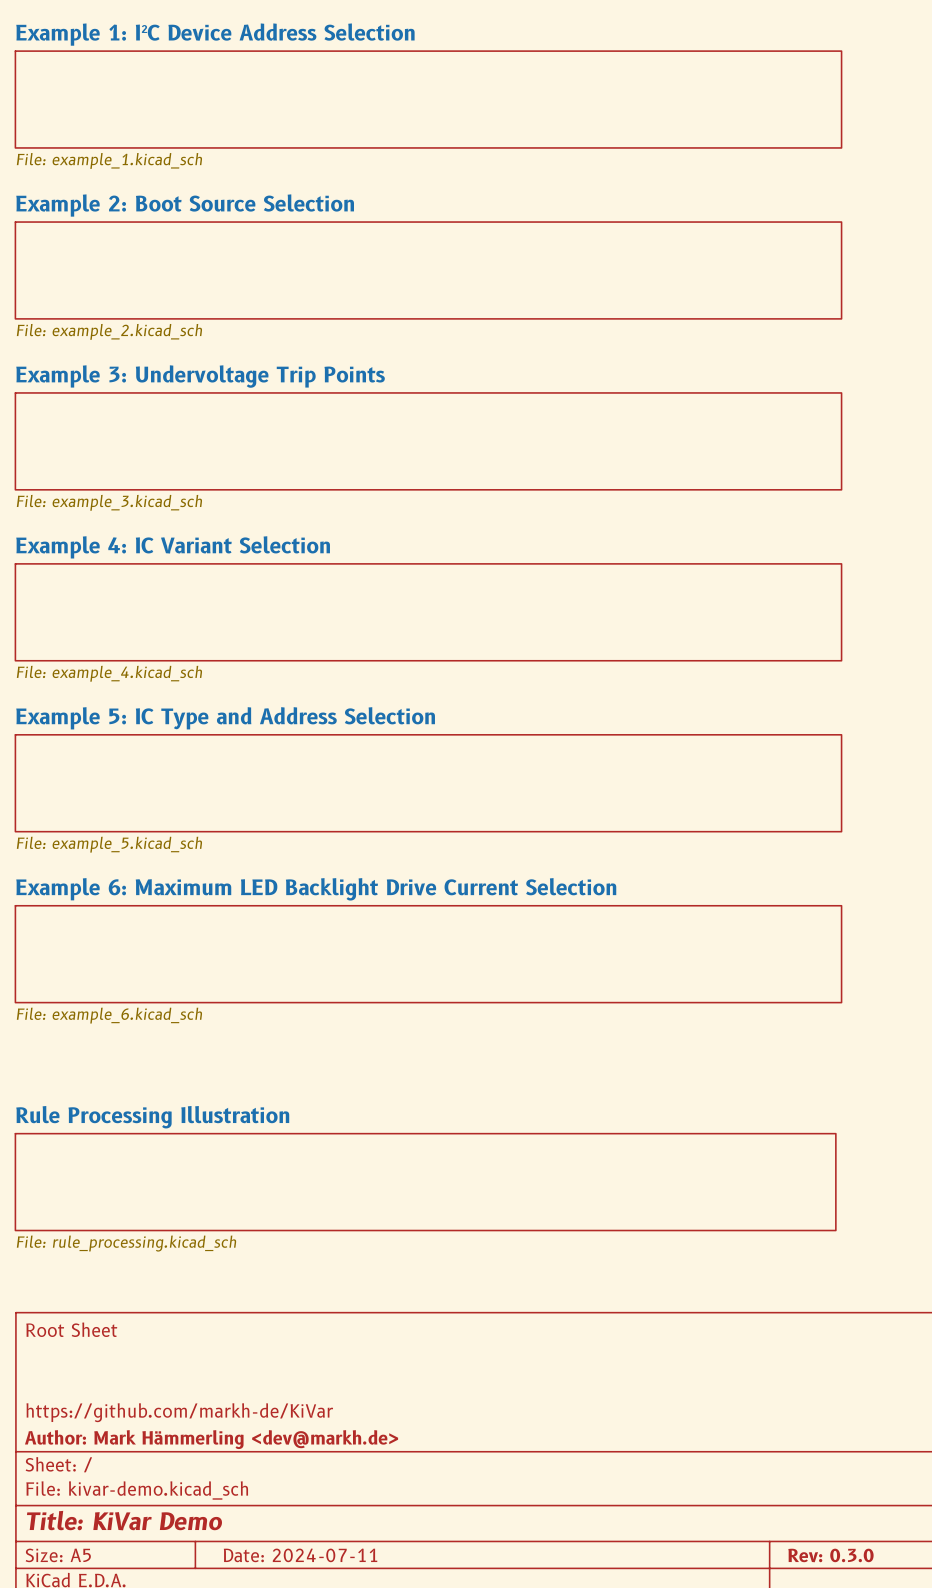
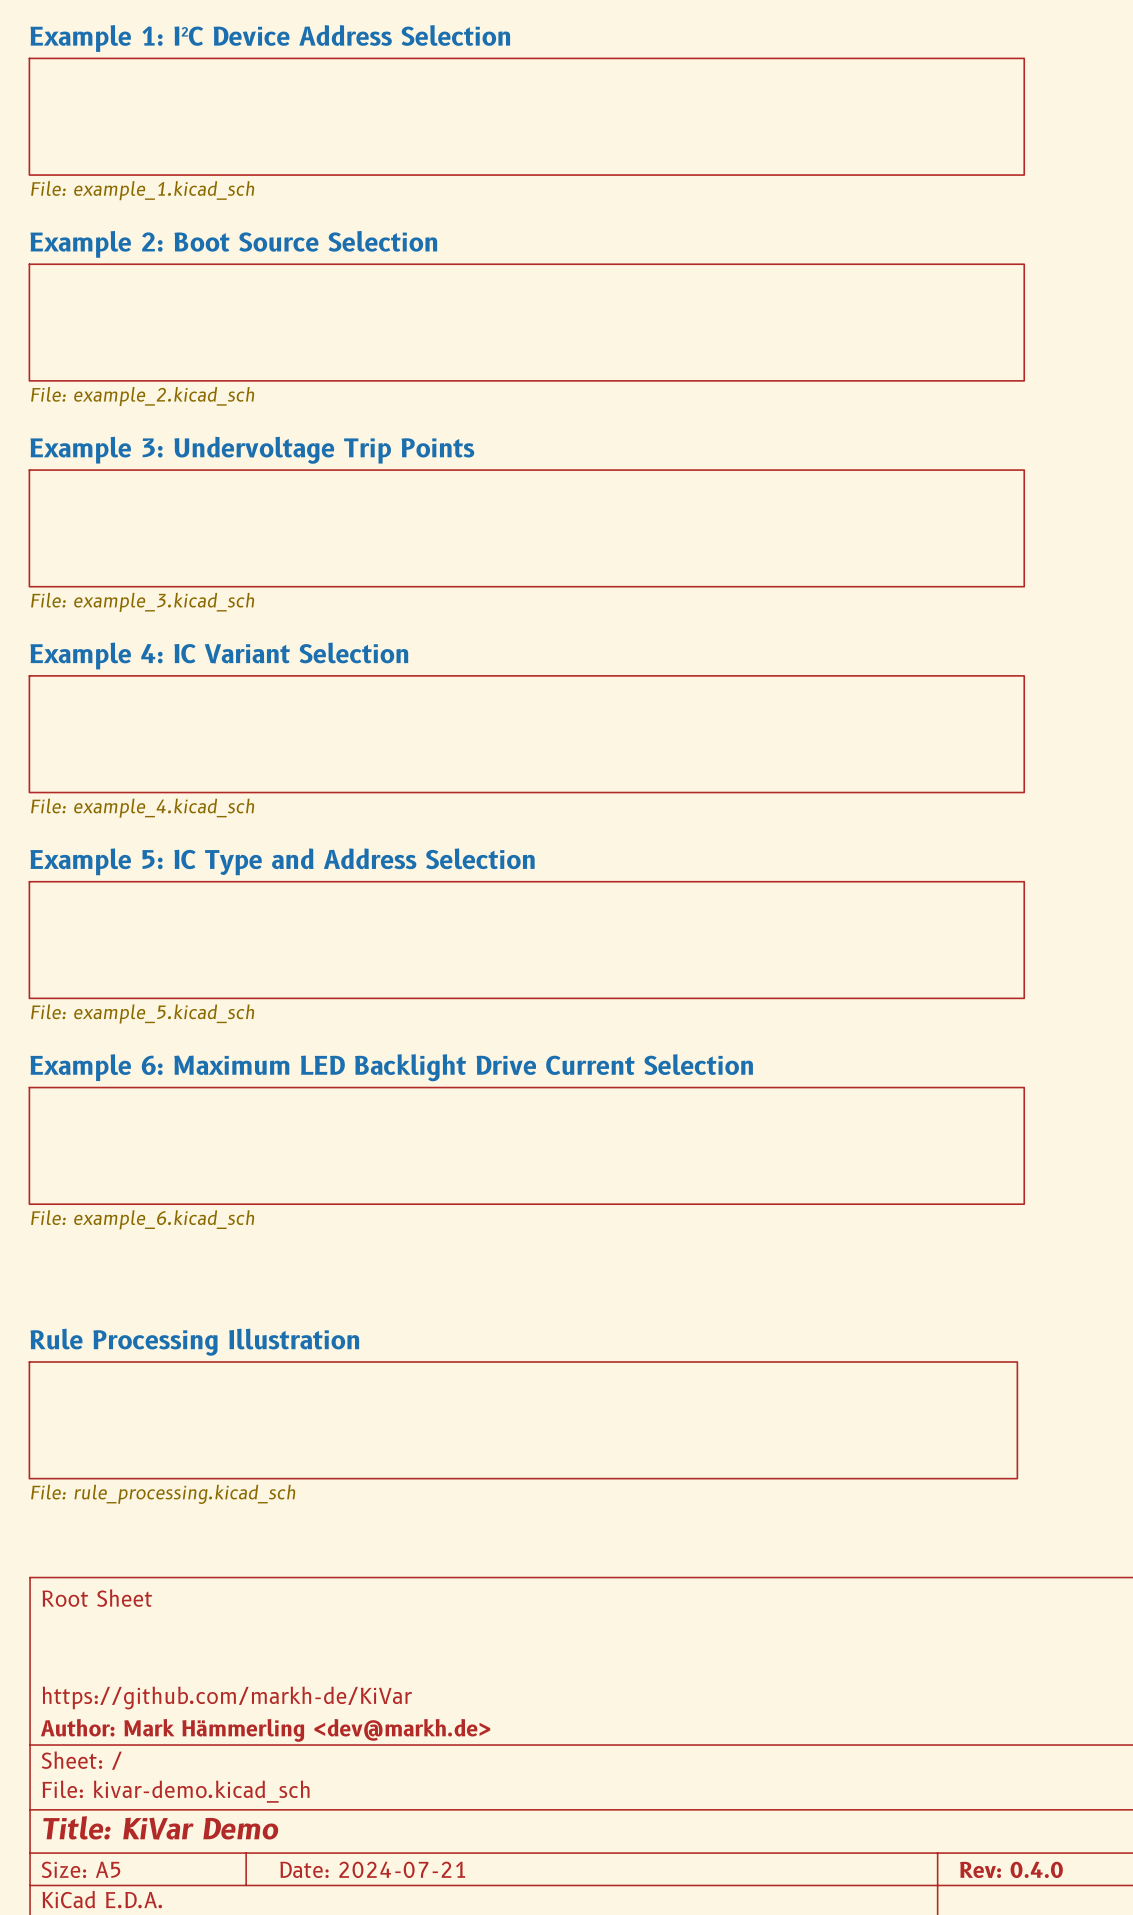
title block: Date: 2024-07-11 (300, 1555) -> Date: 2024-07-21 (372, 1869)
title block: Rev: 0.3.0 (830, 1555) -> Rev: 0.4.0 (1011, 1869)

